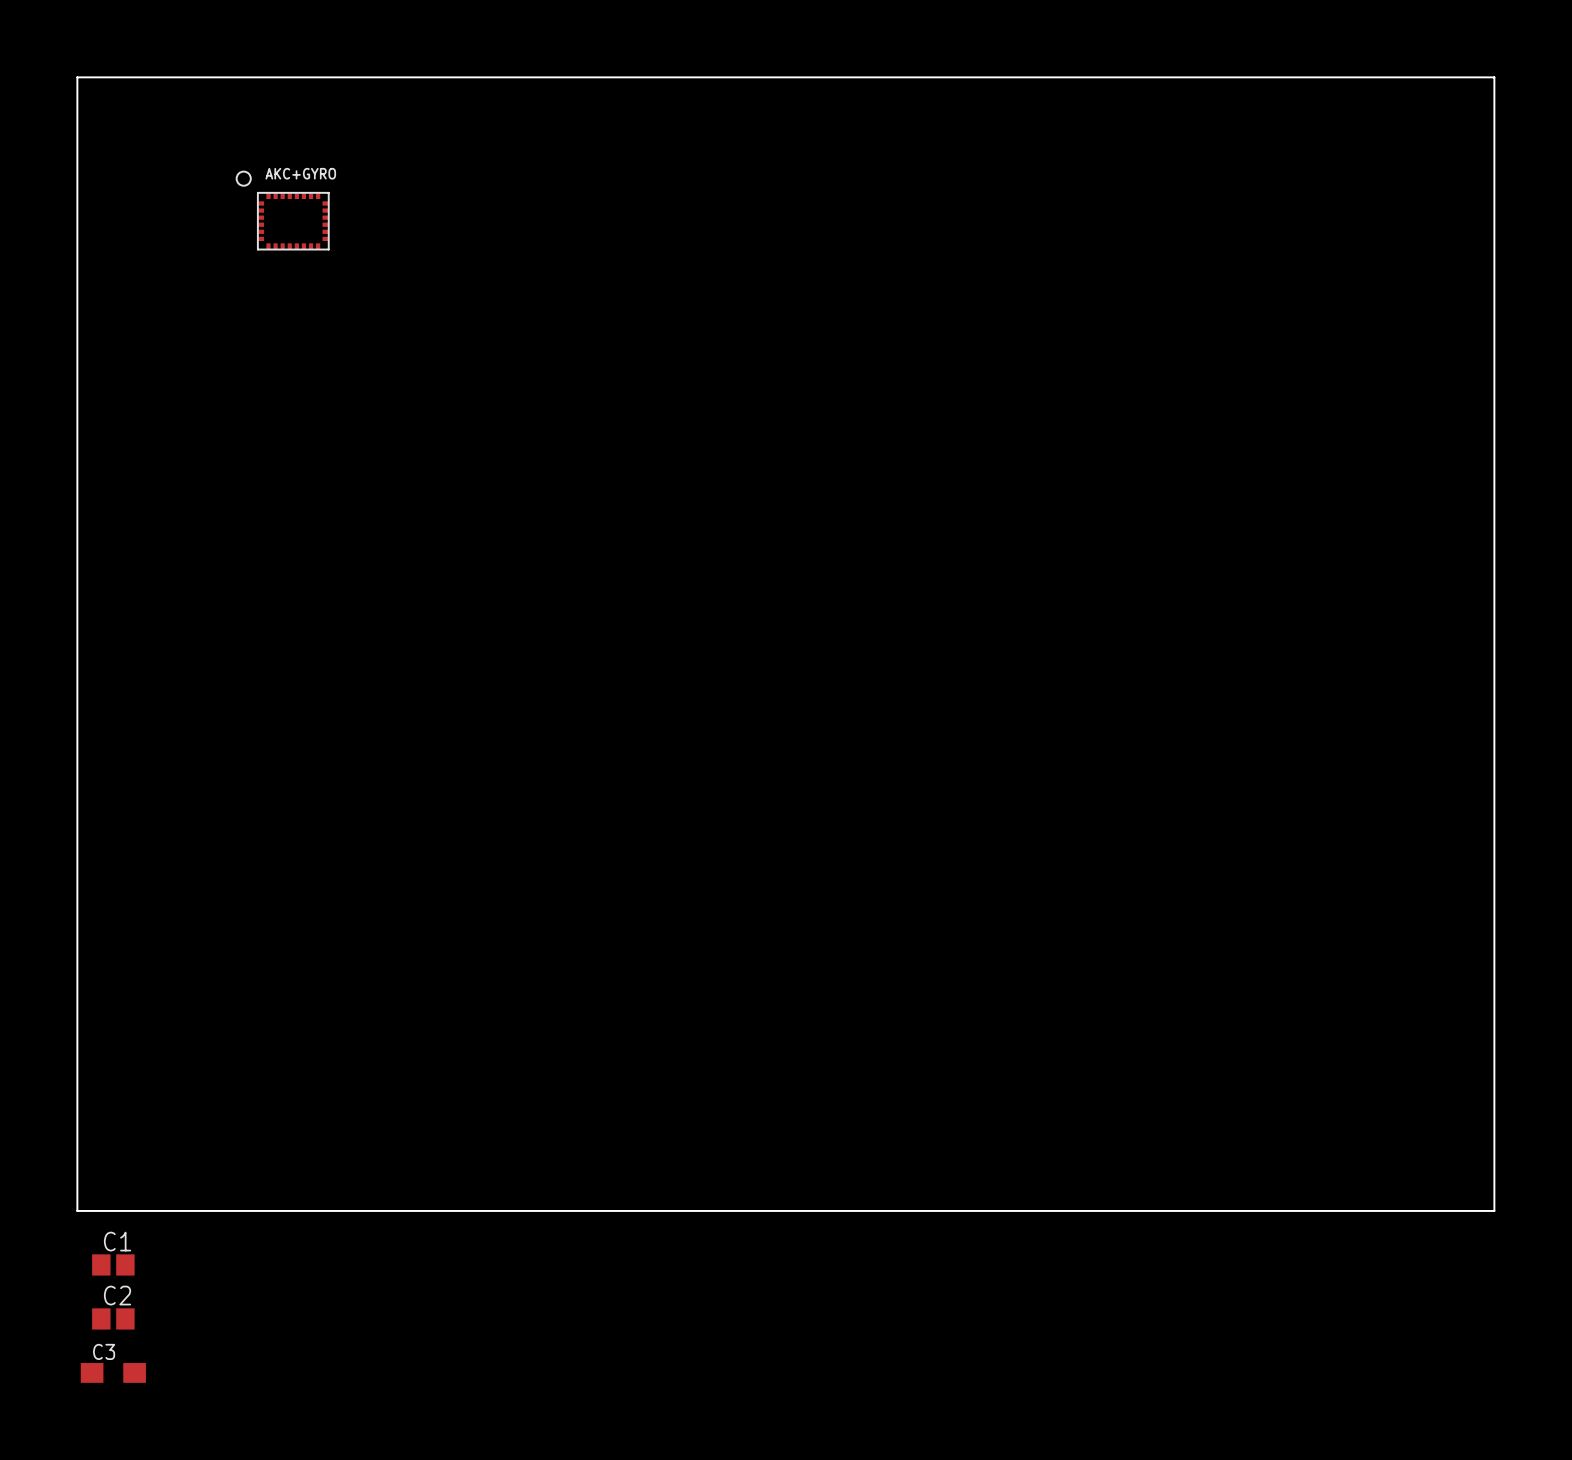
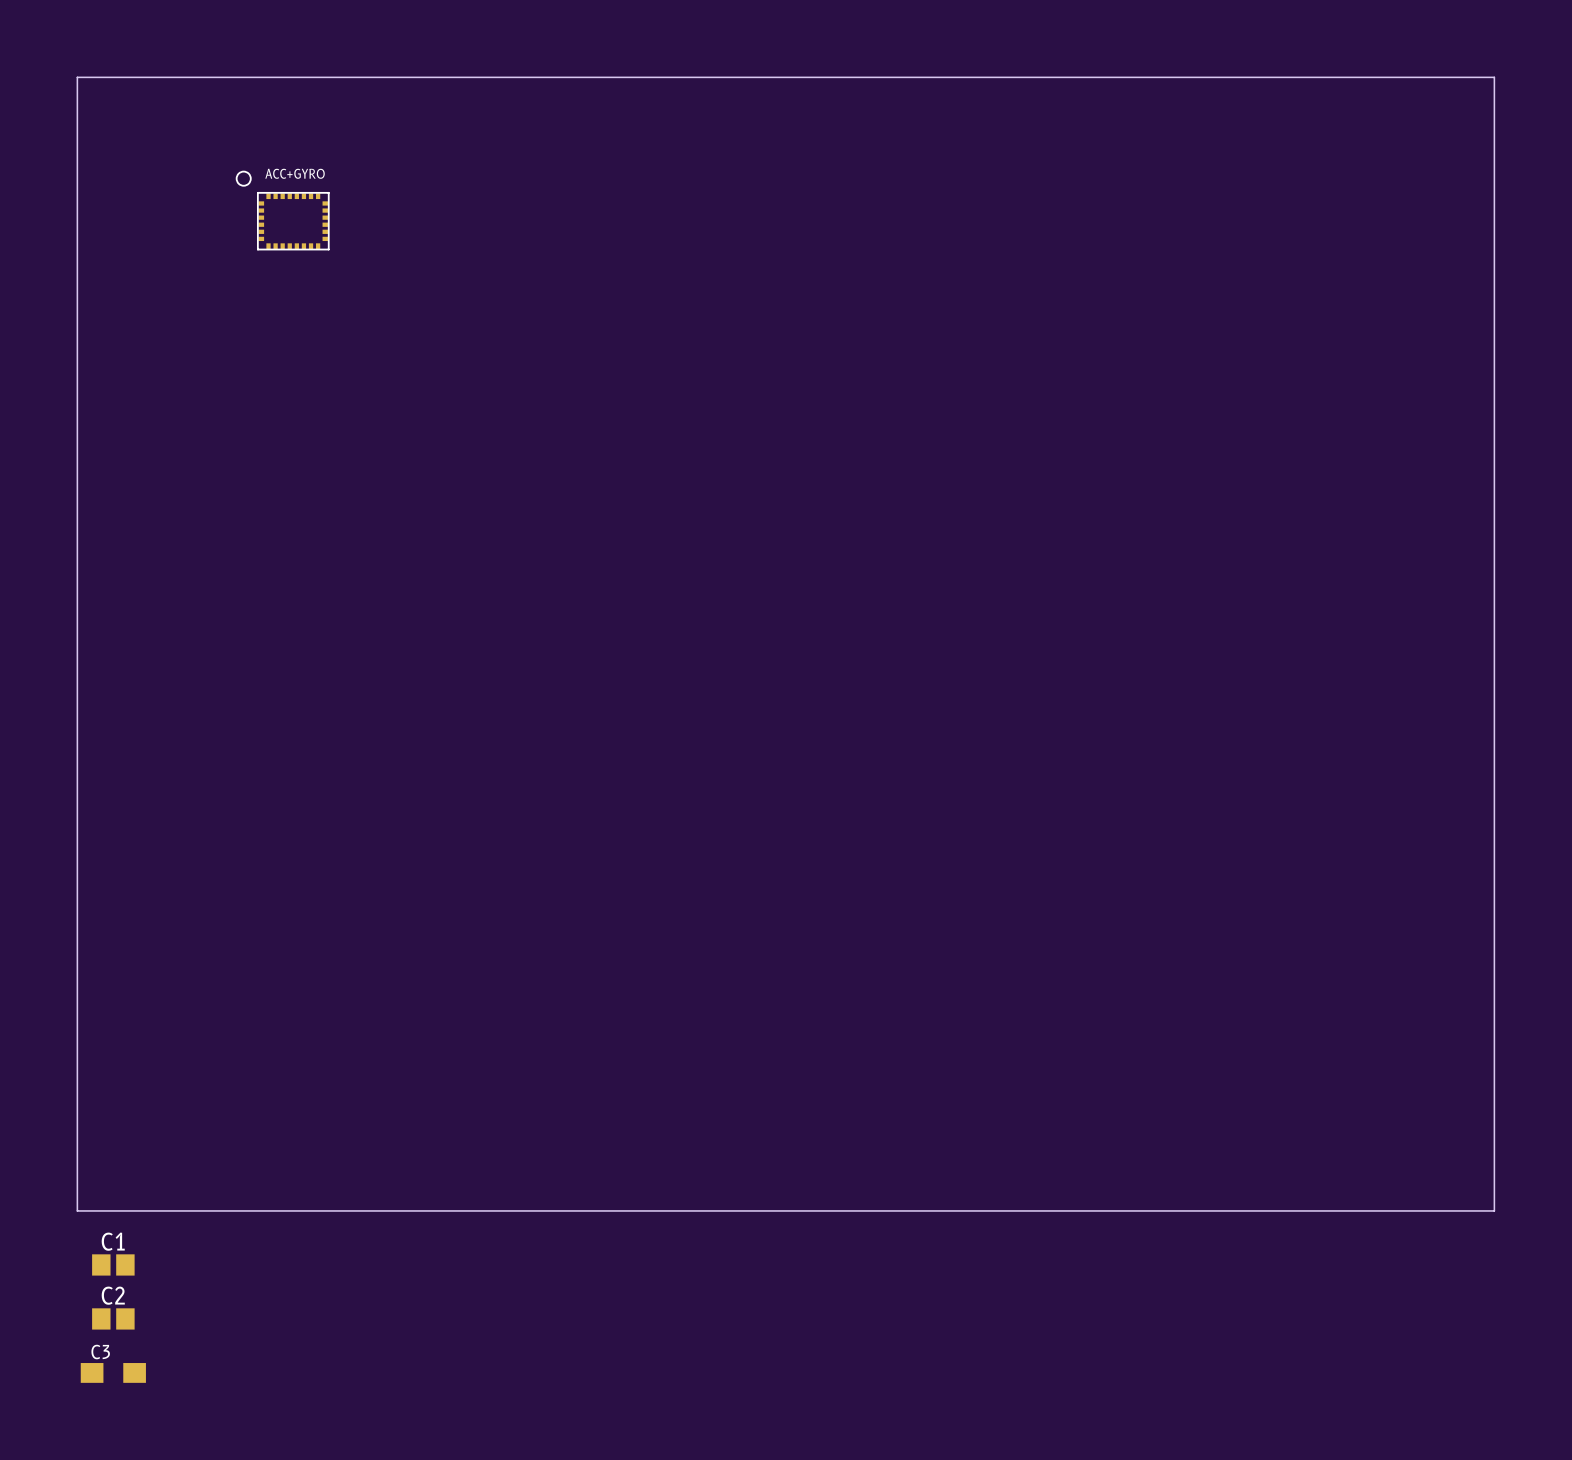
AKC+GYRO name: AKC+GYRO (300, 173) -> ACC+GYRO (295, 173)

